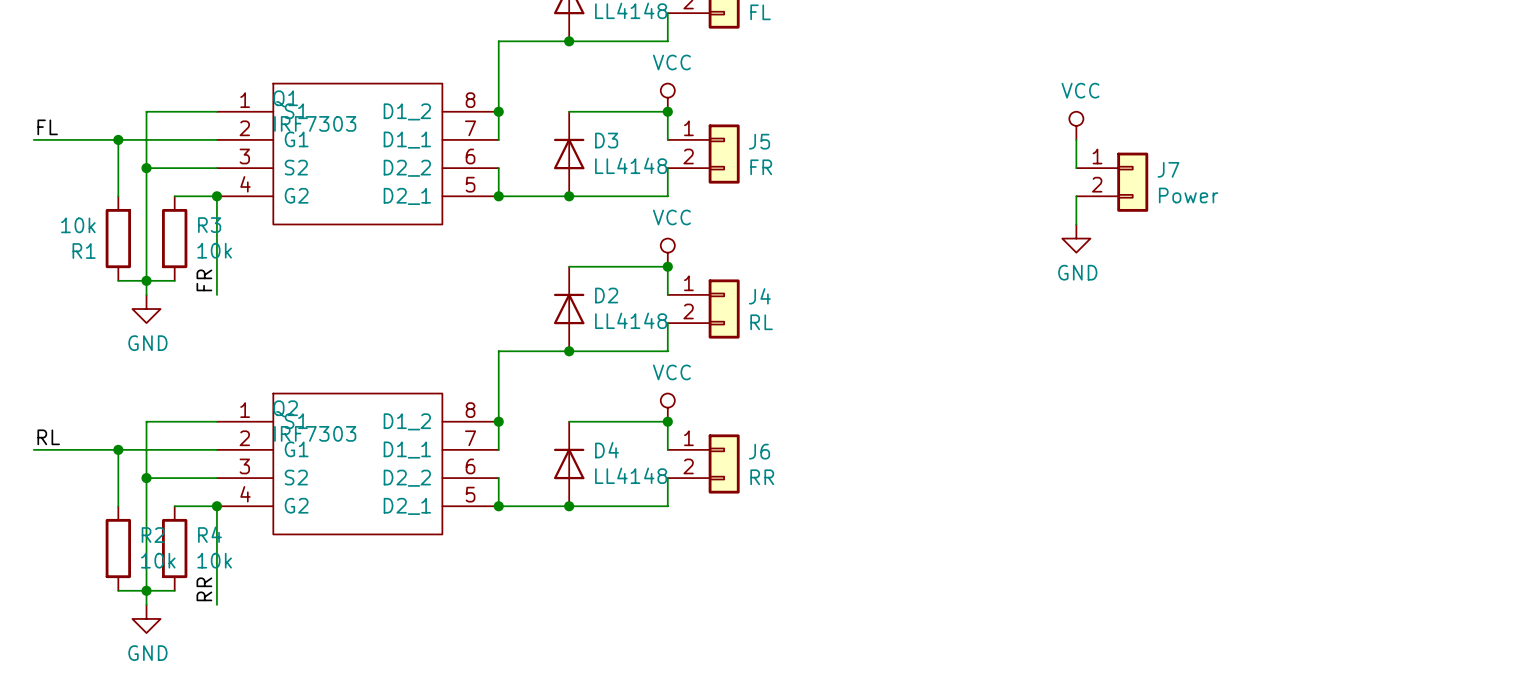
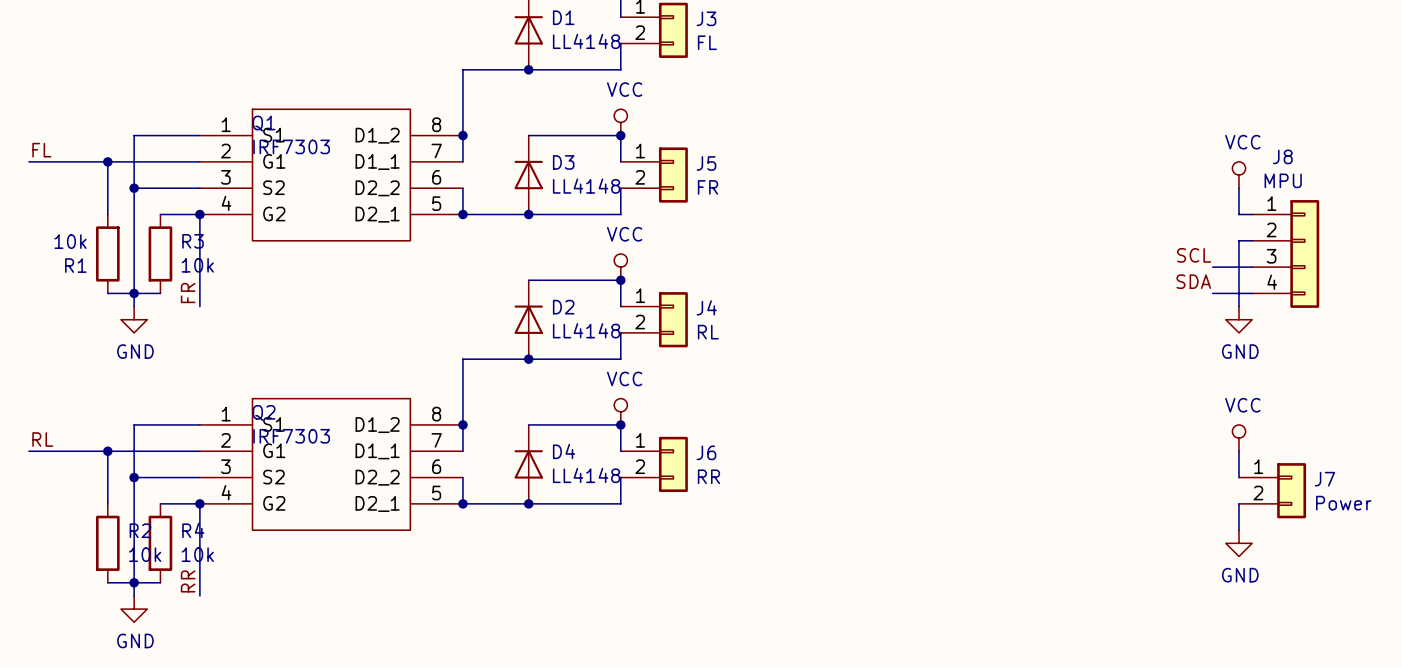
power symbol: VCC (1076, 125) -> none
wire: (1076, 139) (1076, 168) -> none
power symbol: none -> VCC (1238, 175)
wire: none -> (1238, 188) (1238, 214) (1252, 214)
J7 position: (1112, 182) -> (1272, 490)
wire: (1076, 196) (1076, 224) -> none
wire: none -> (1252, 240) (1238, 240) (1238, 306)
power symbol: GND (1076, 238) -> none
J8: none -> MPU (1285, 253)
label: none -> SCL (1194, 255)
wire: none -> (1212, 267) (1252, 267)
label: none -> SDA (1193, 281)
wire: none -> (1212, 293) (1252, 293)
power symbol: none -> GND (1238, 319)
power symbol: none -> VCC (1238, 438)
wire: none -> (1238, 451) (1238, 477)
wire: none -> (1238, 503) (1238, 530)
power symbol: none -> GND (1238, 543)

